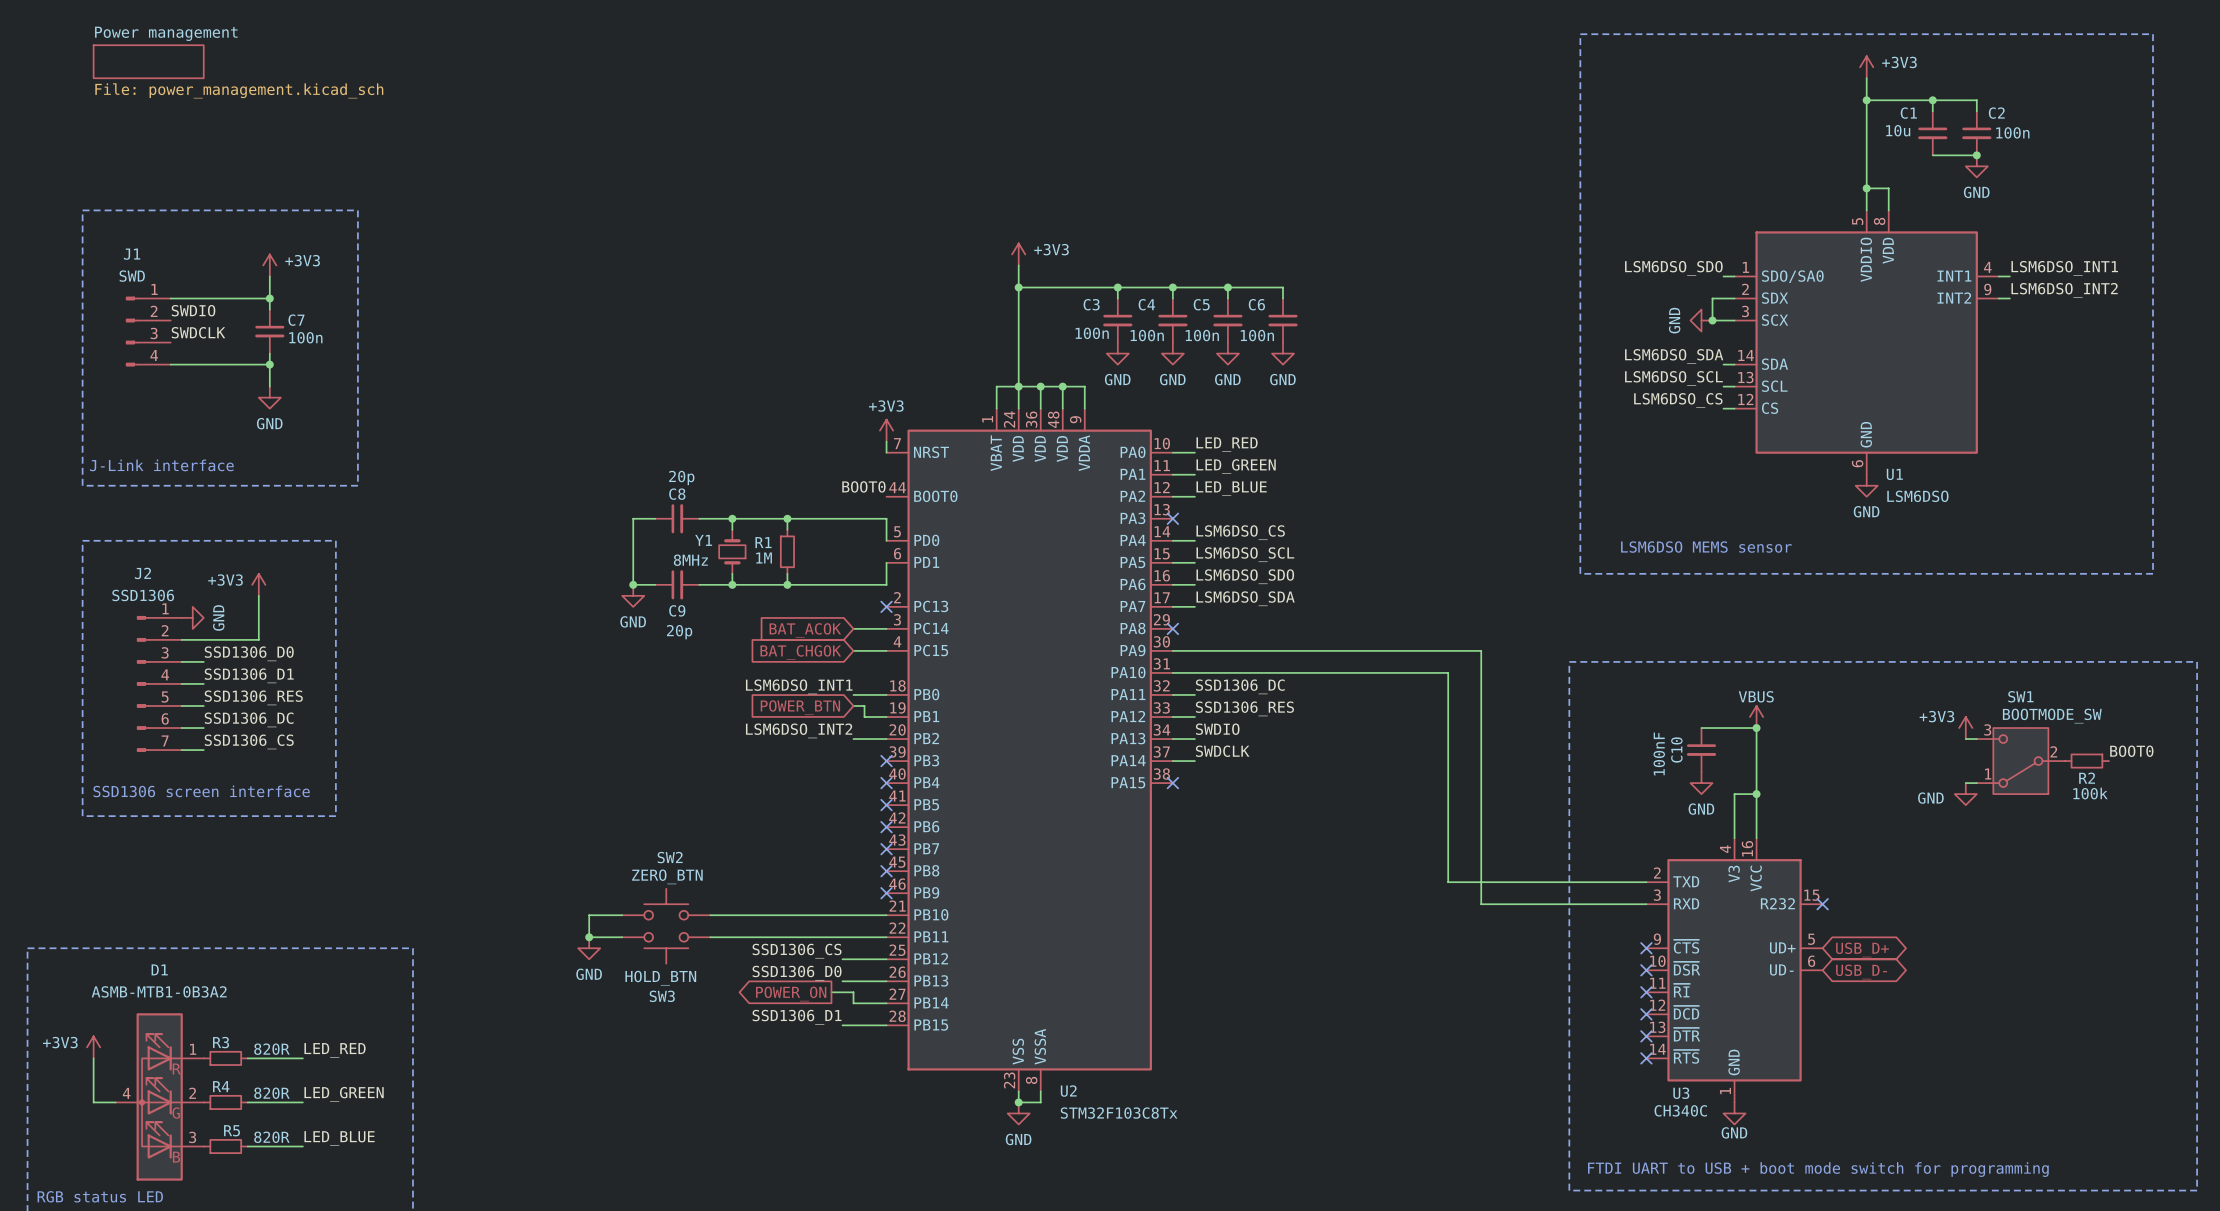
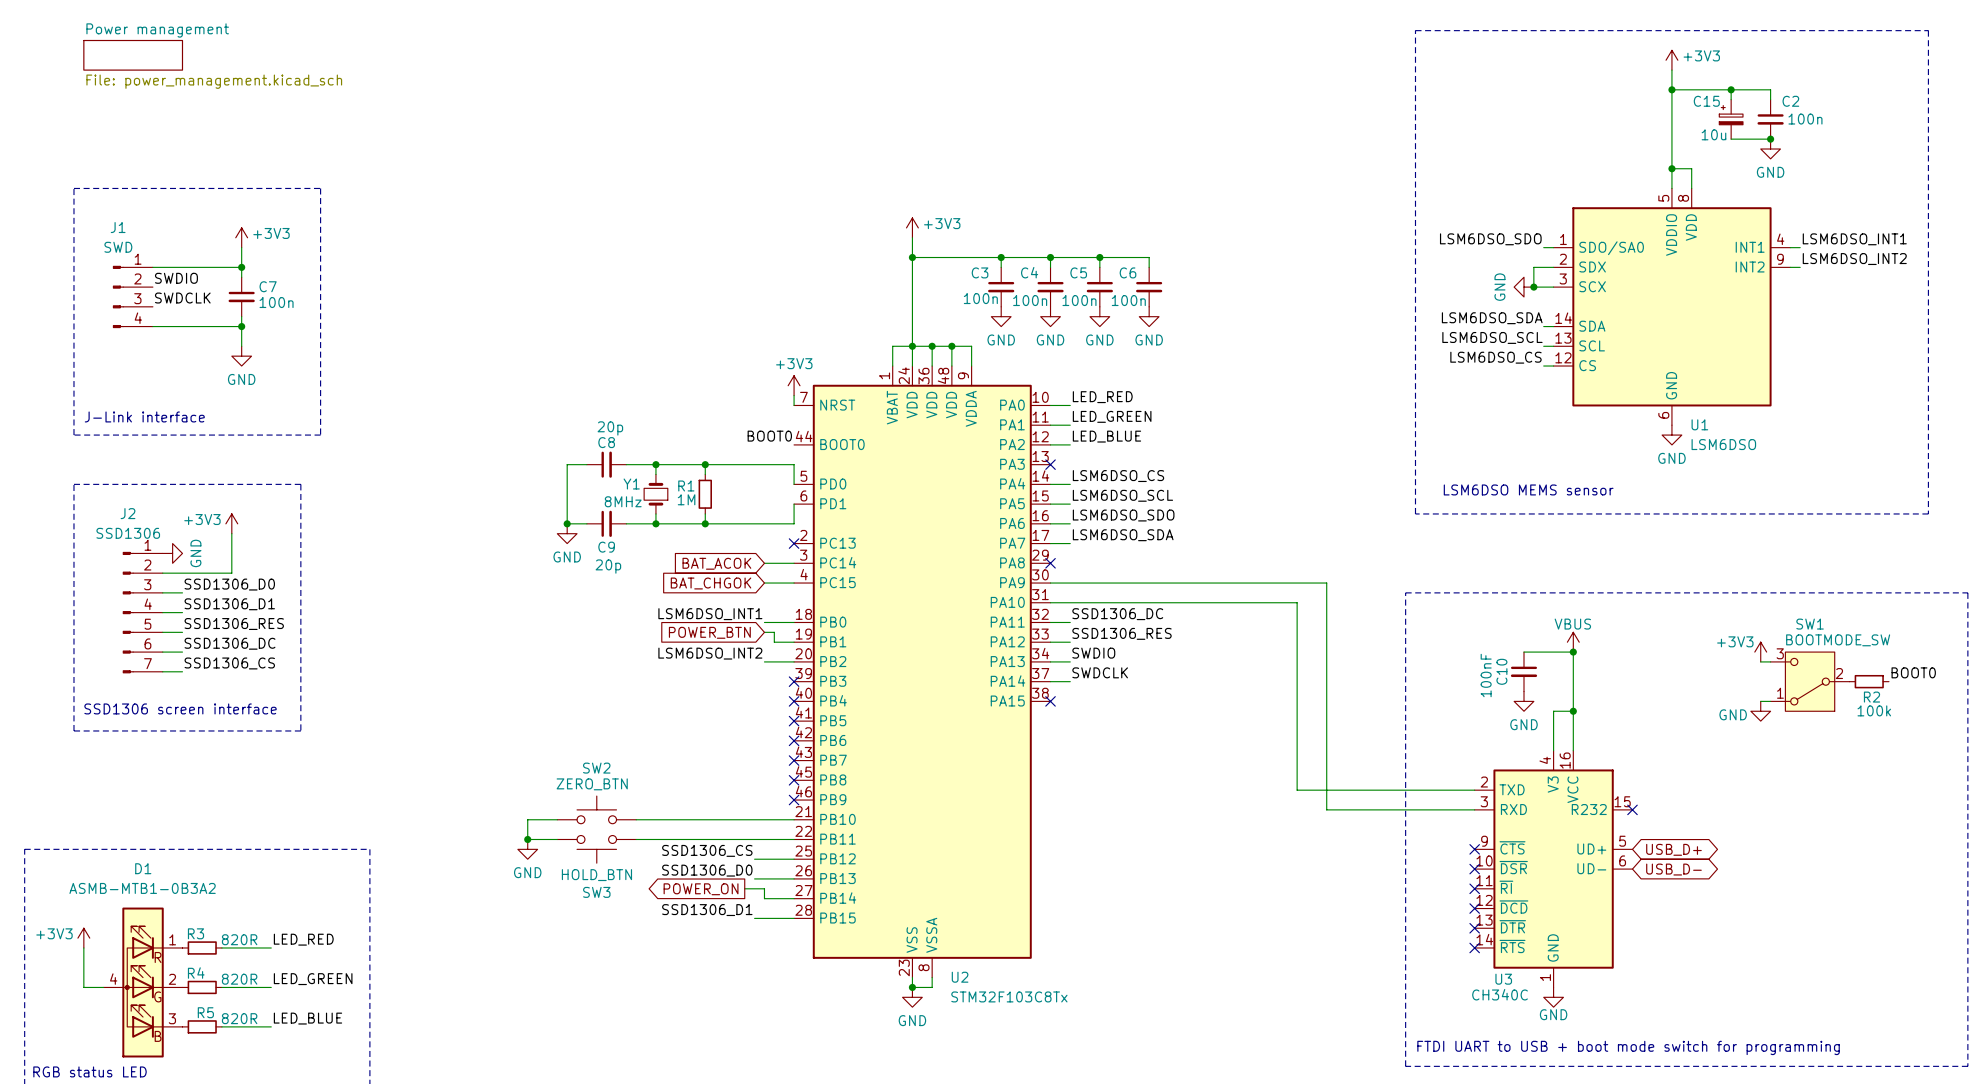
C1: 10u (1932, 133) -> none
C15: none -> 10u (1731, 119)

